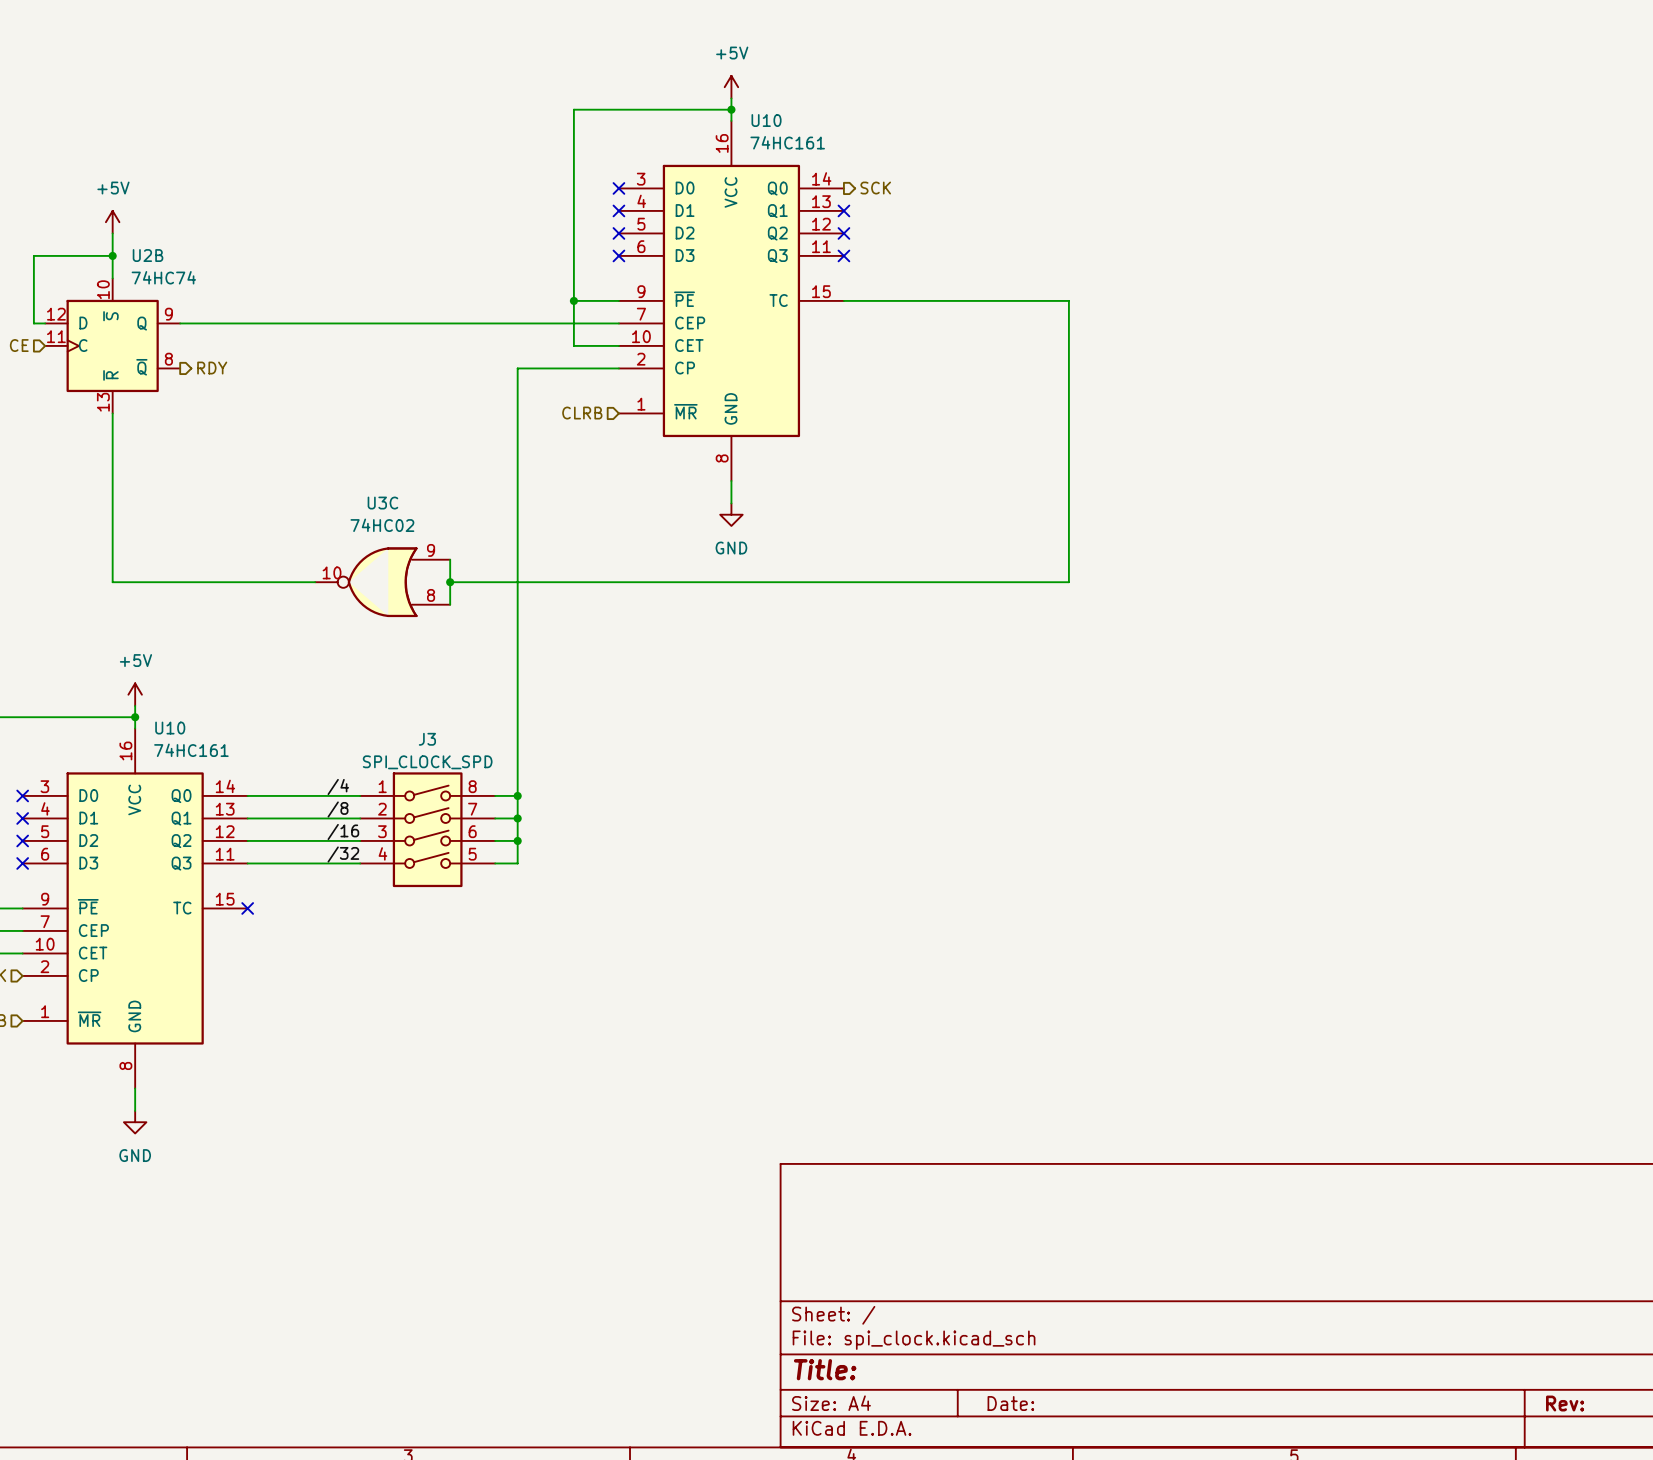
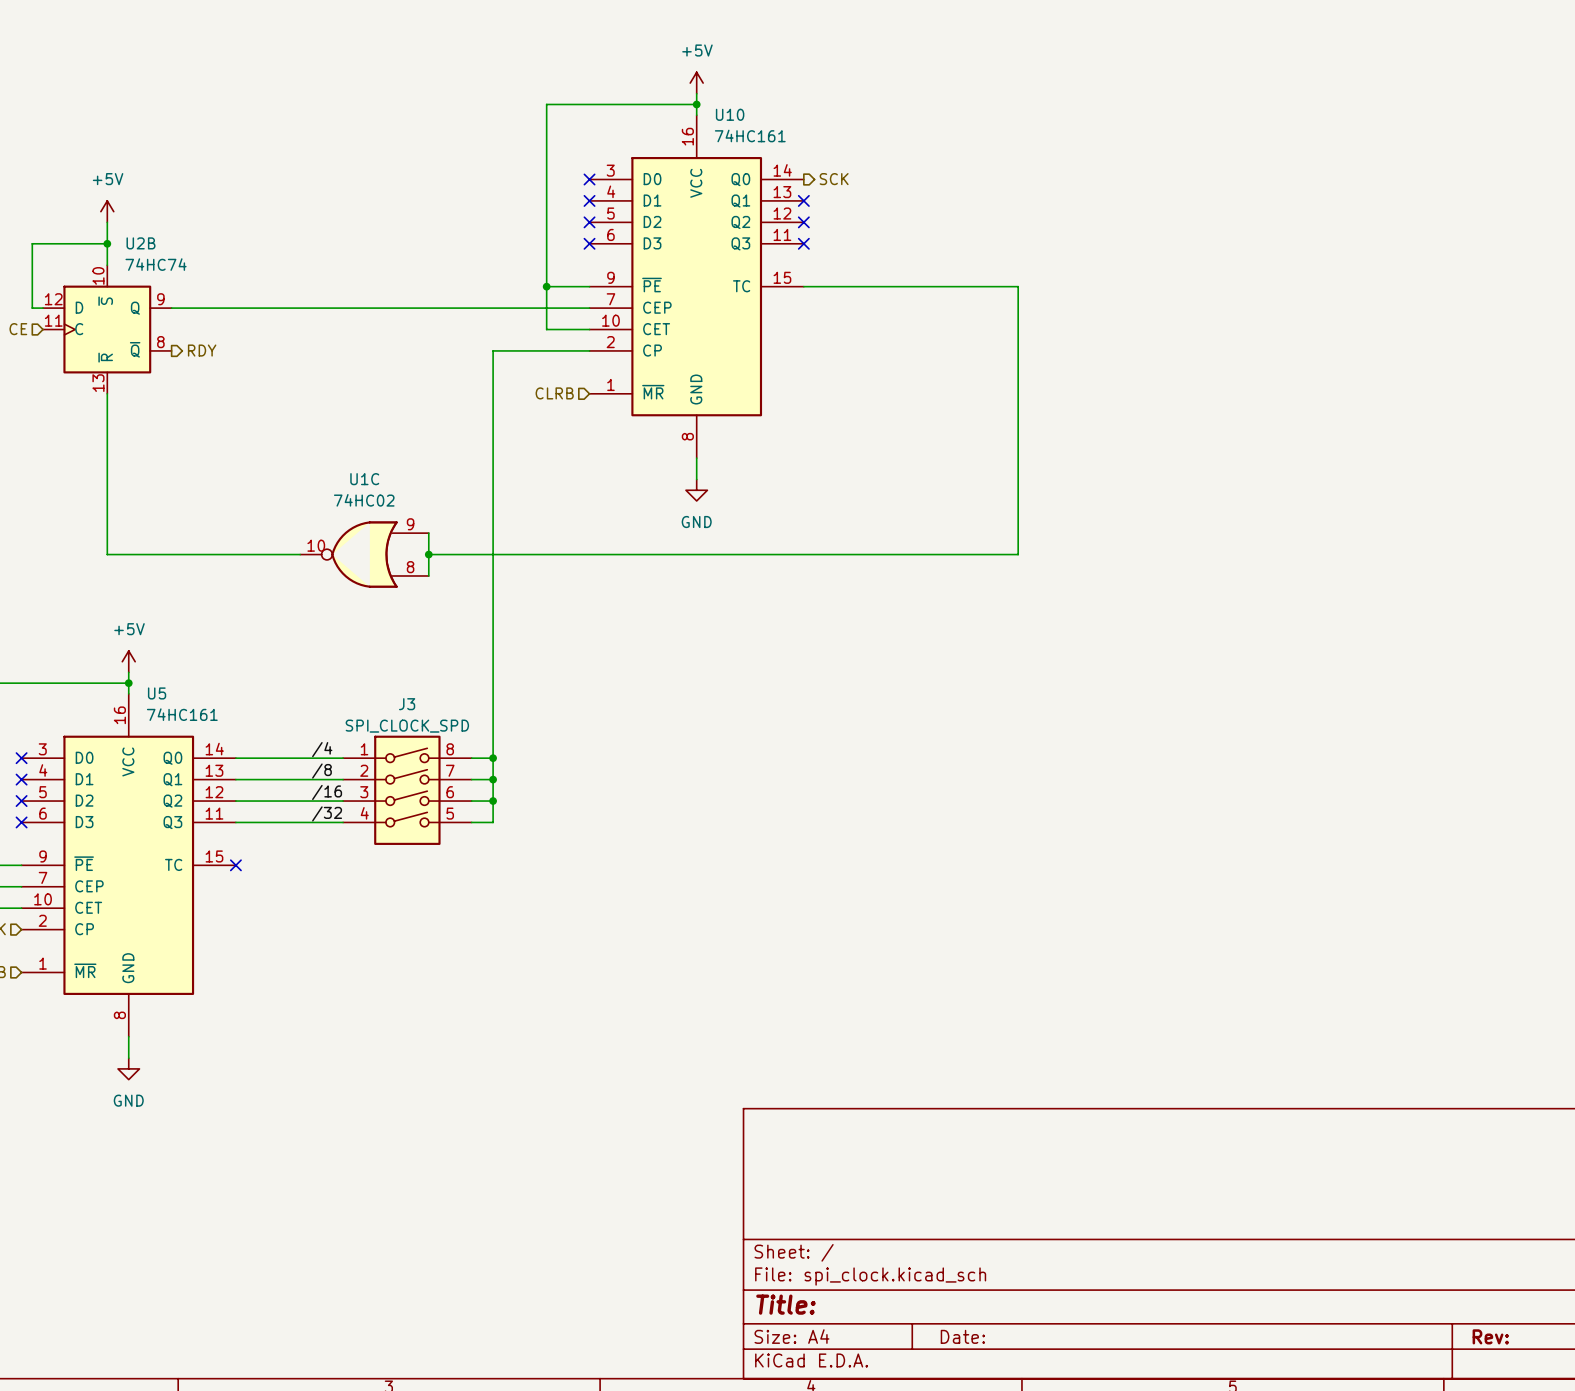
U3C name: U3C (382, 503) -> U1C (364, 479)
U10 name: U10 (170, 728) -> U5 (157, 693)

